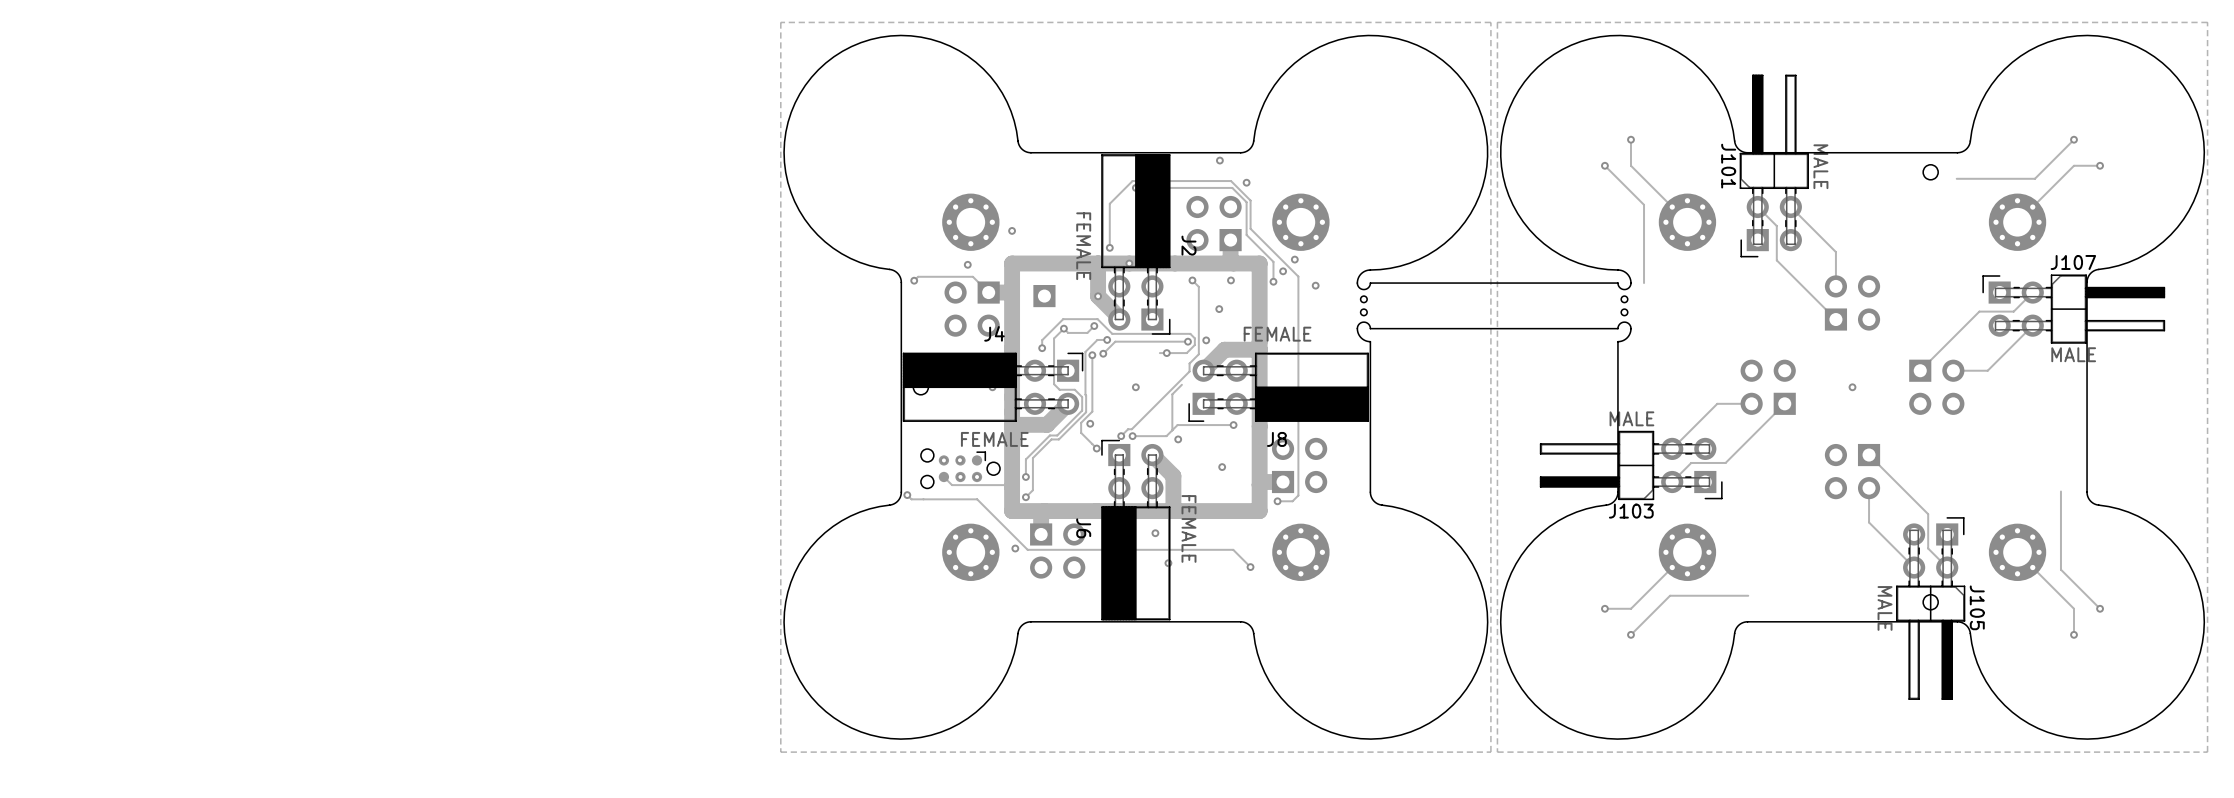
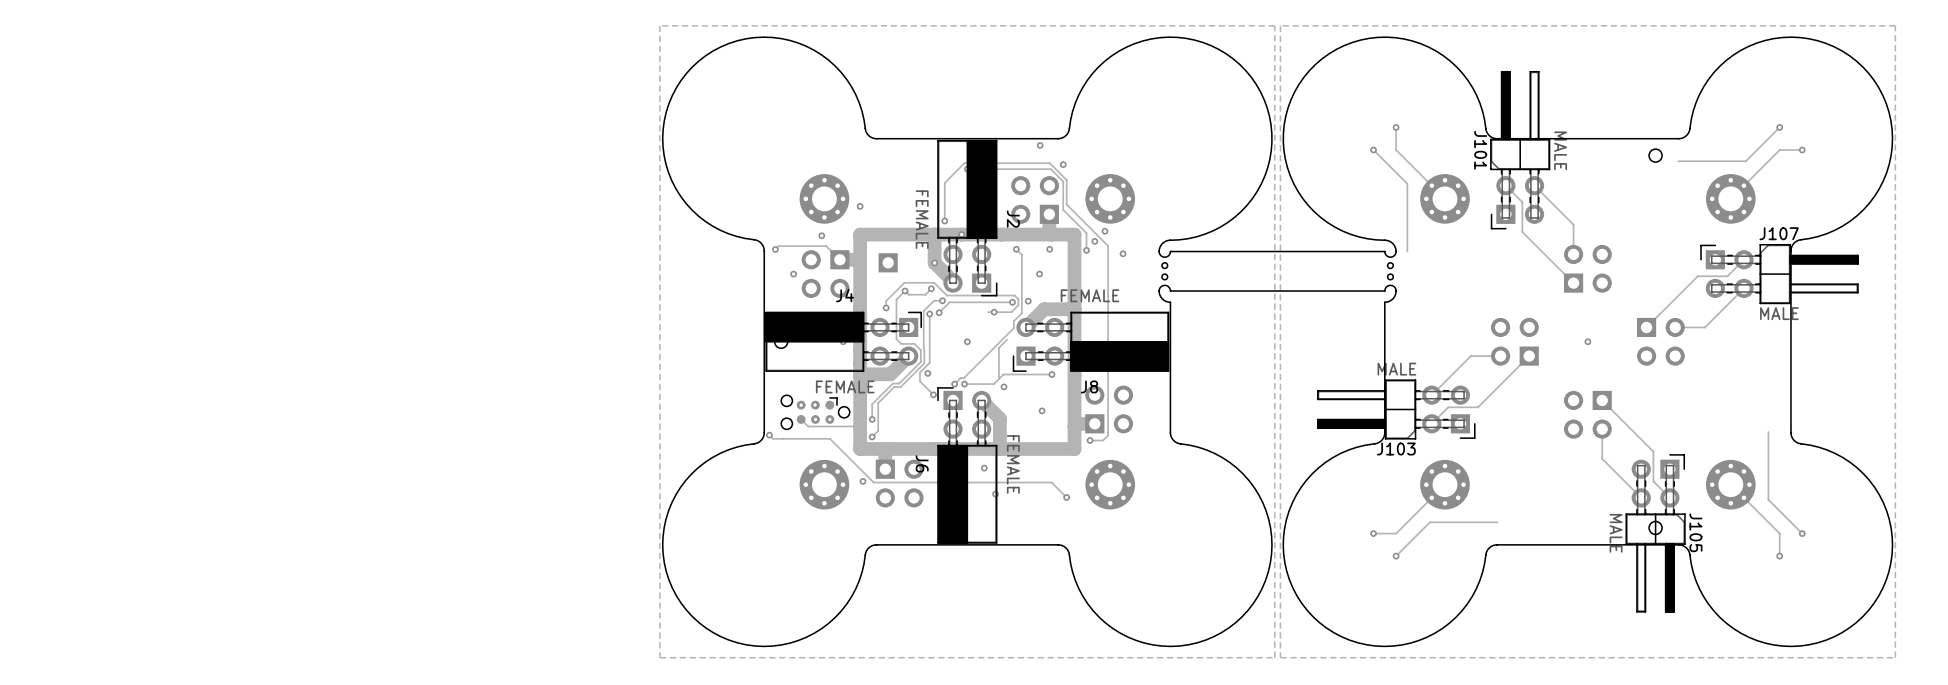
via: none -> (793, 274)

